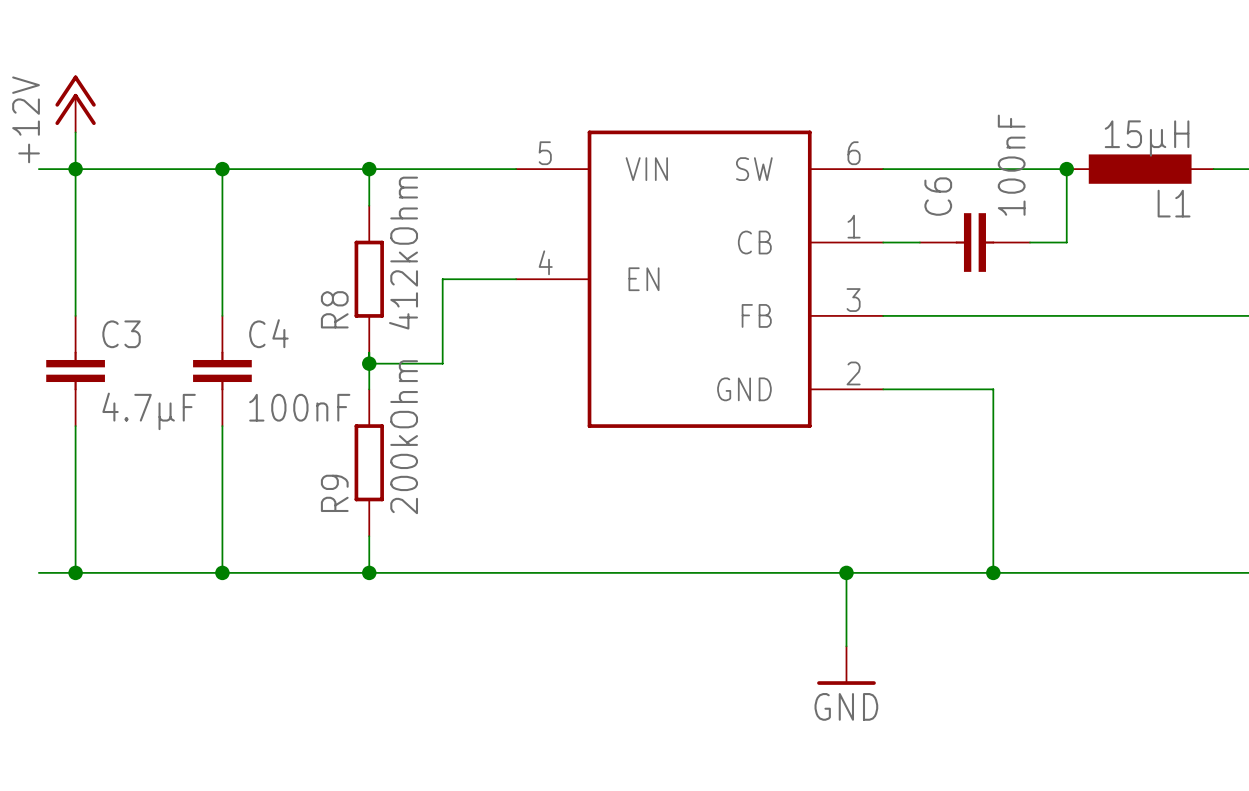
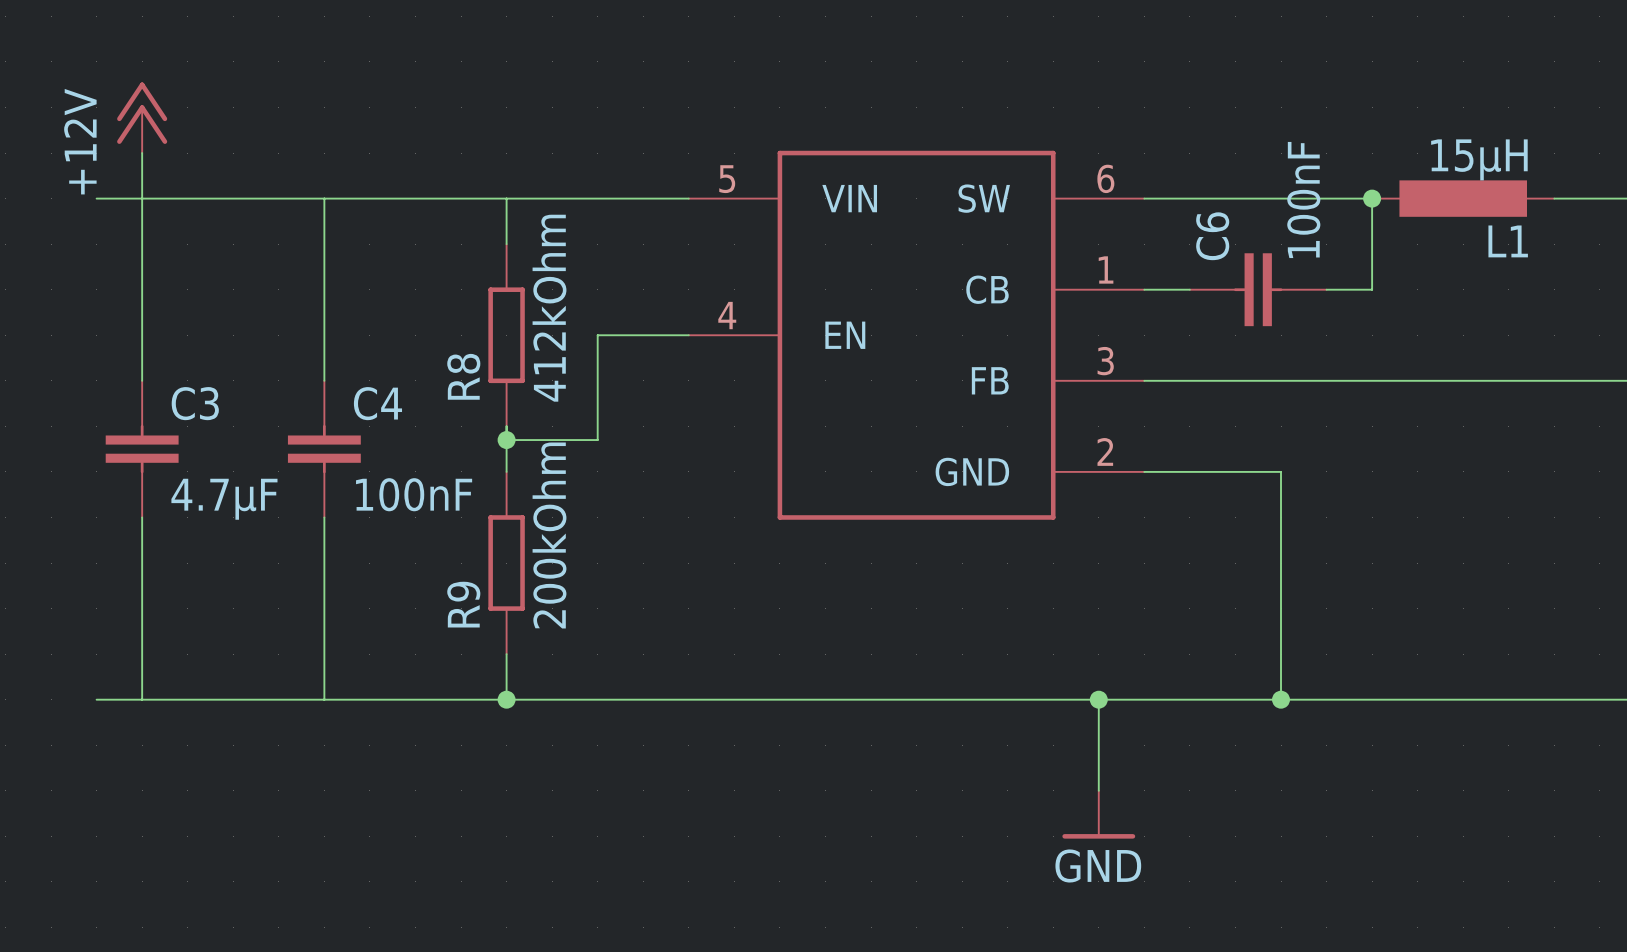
junction: (75, 169) -> none
junction: (222, 169) -> none
junction: (369, 169) -> none
junction: (75, 572) -> none
junction: (222, 572) -> none

